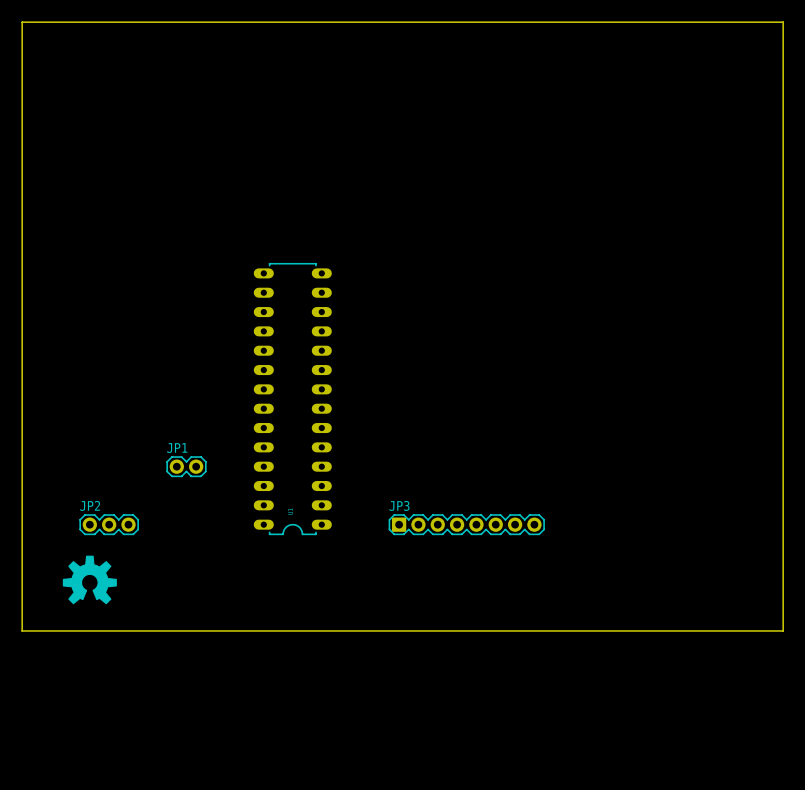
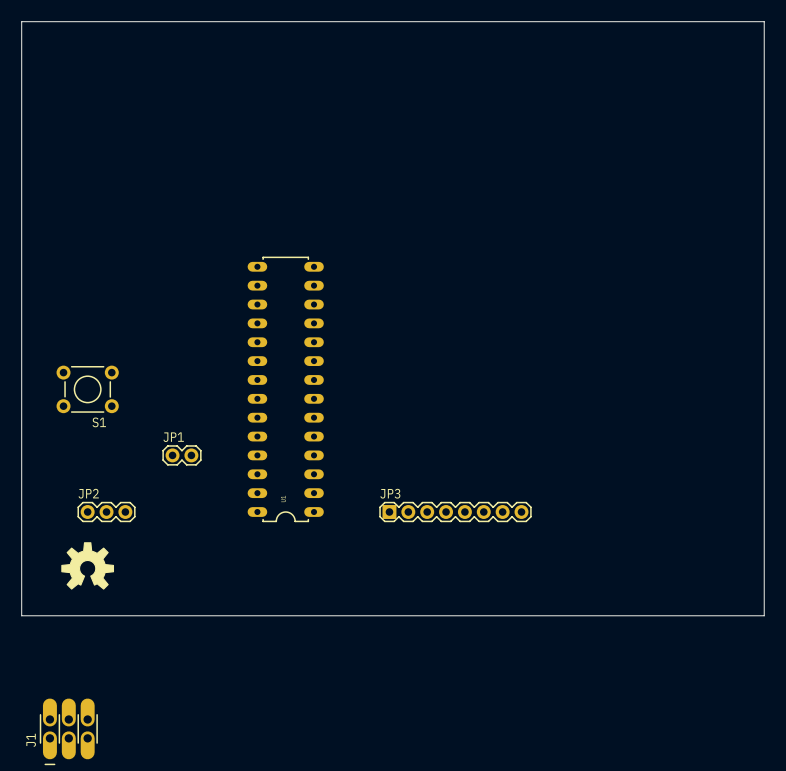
S1: none -> (87, 389)
J1: none -> (68, 731)

